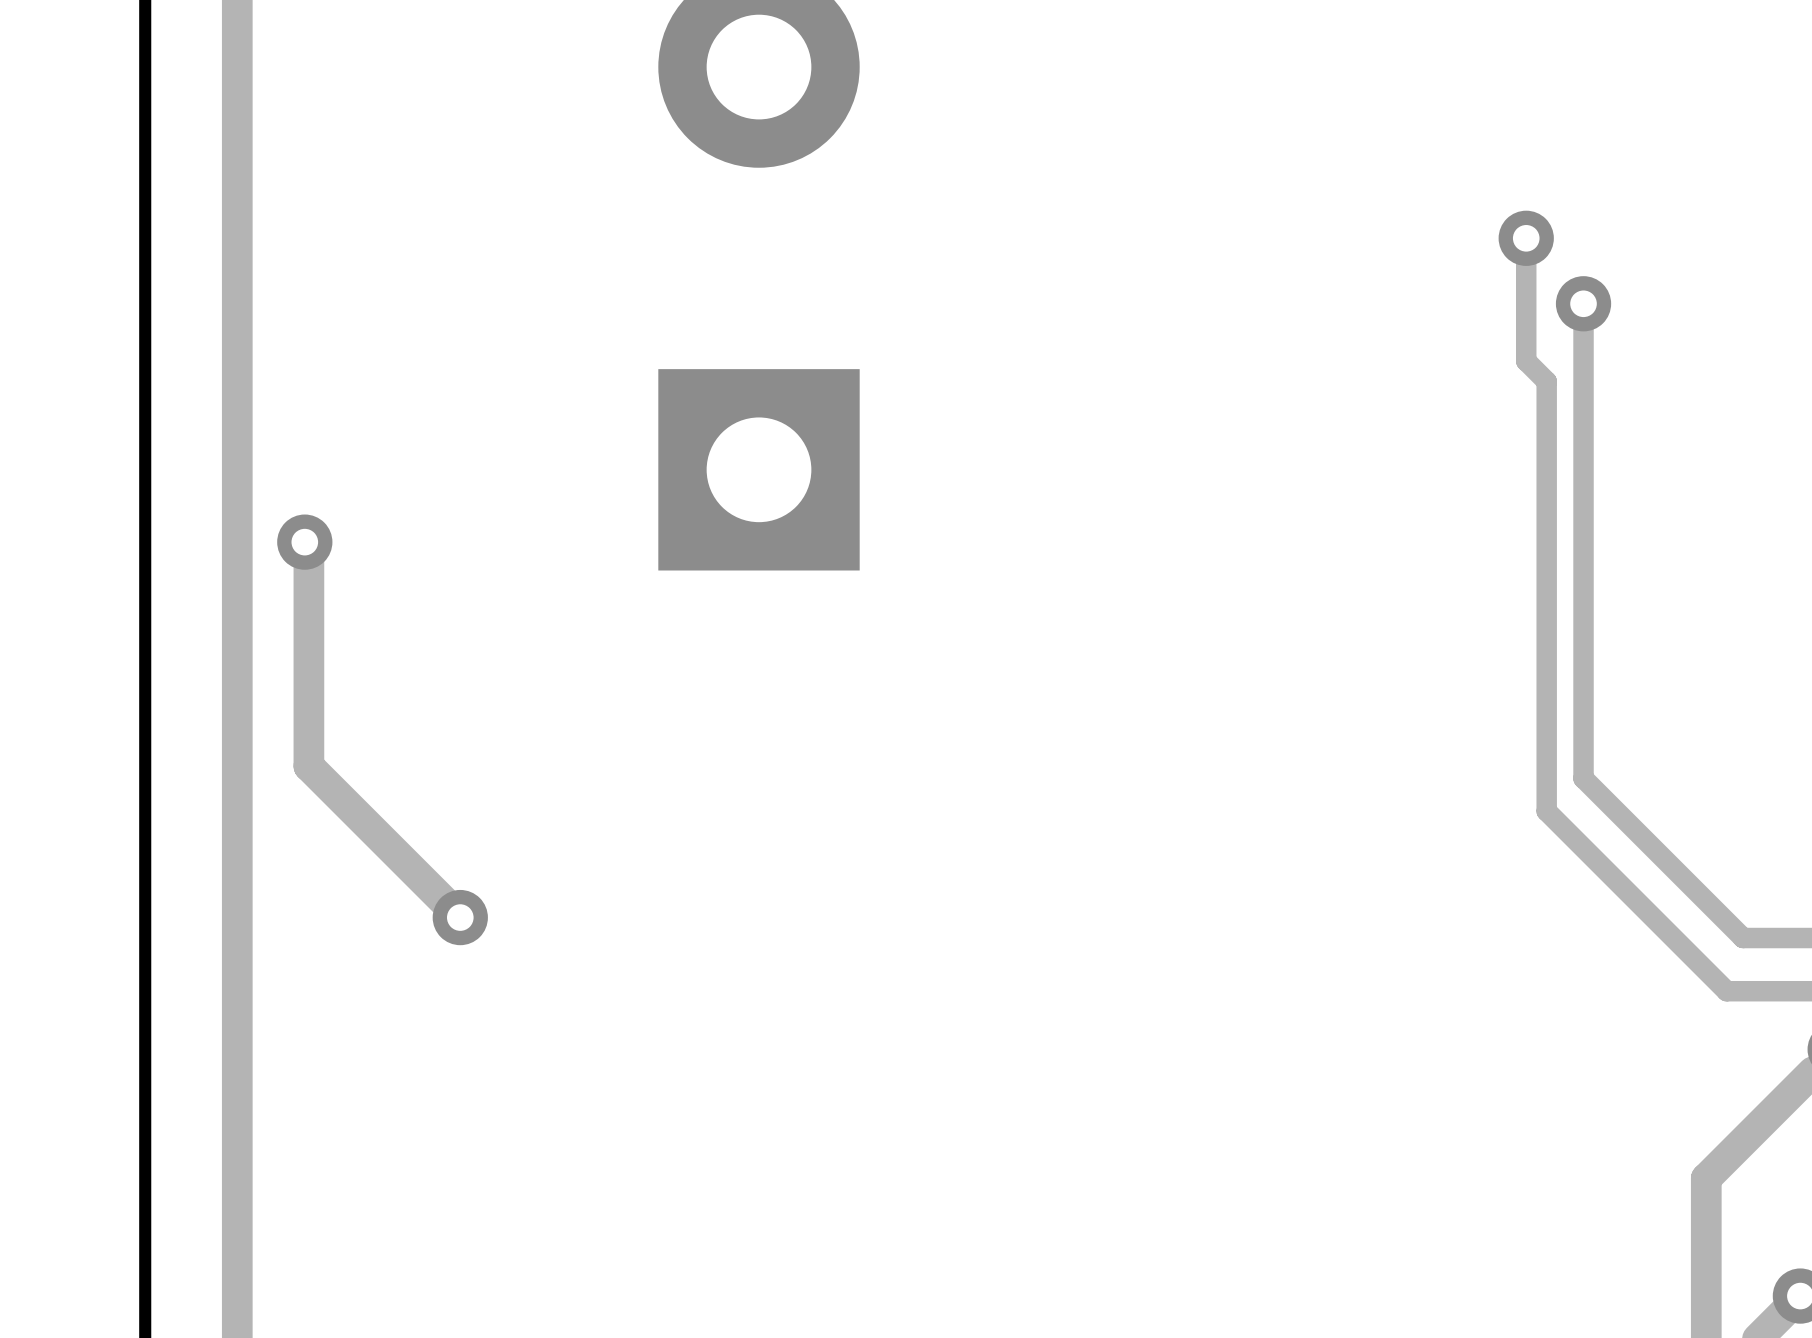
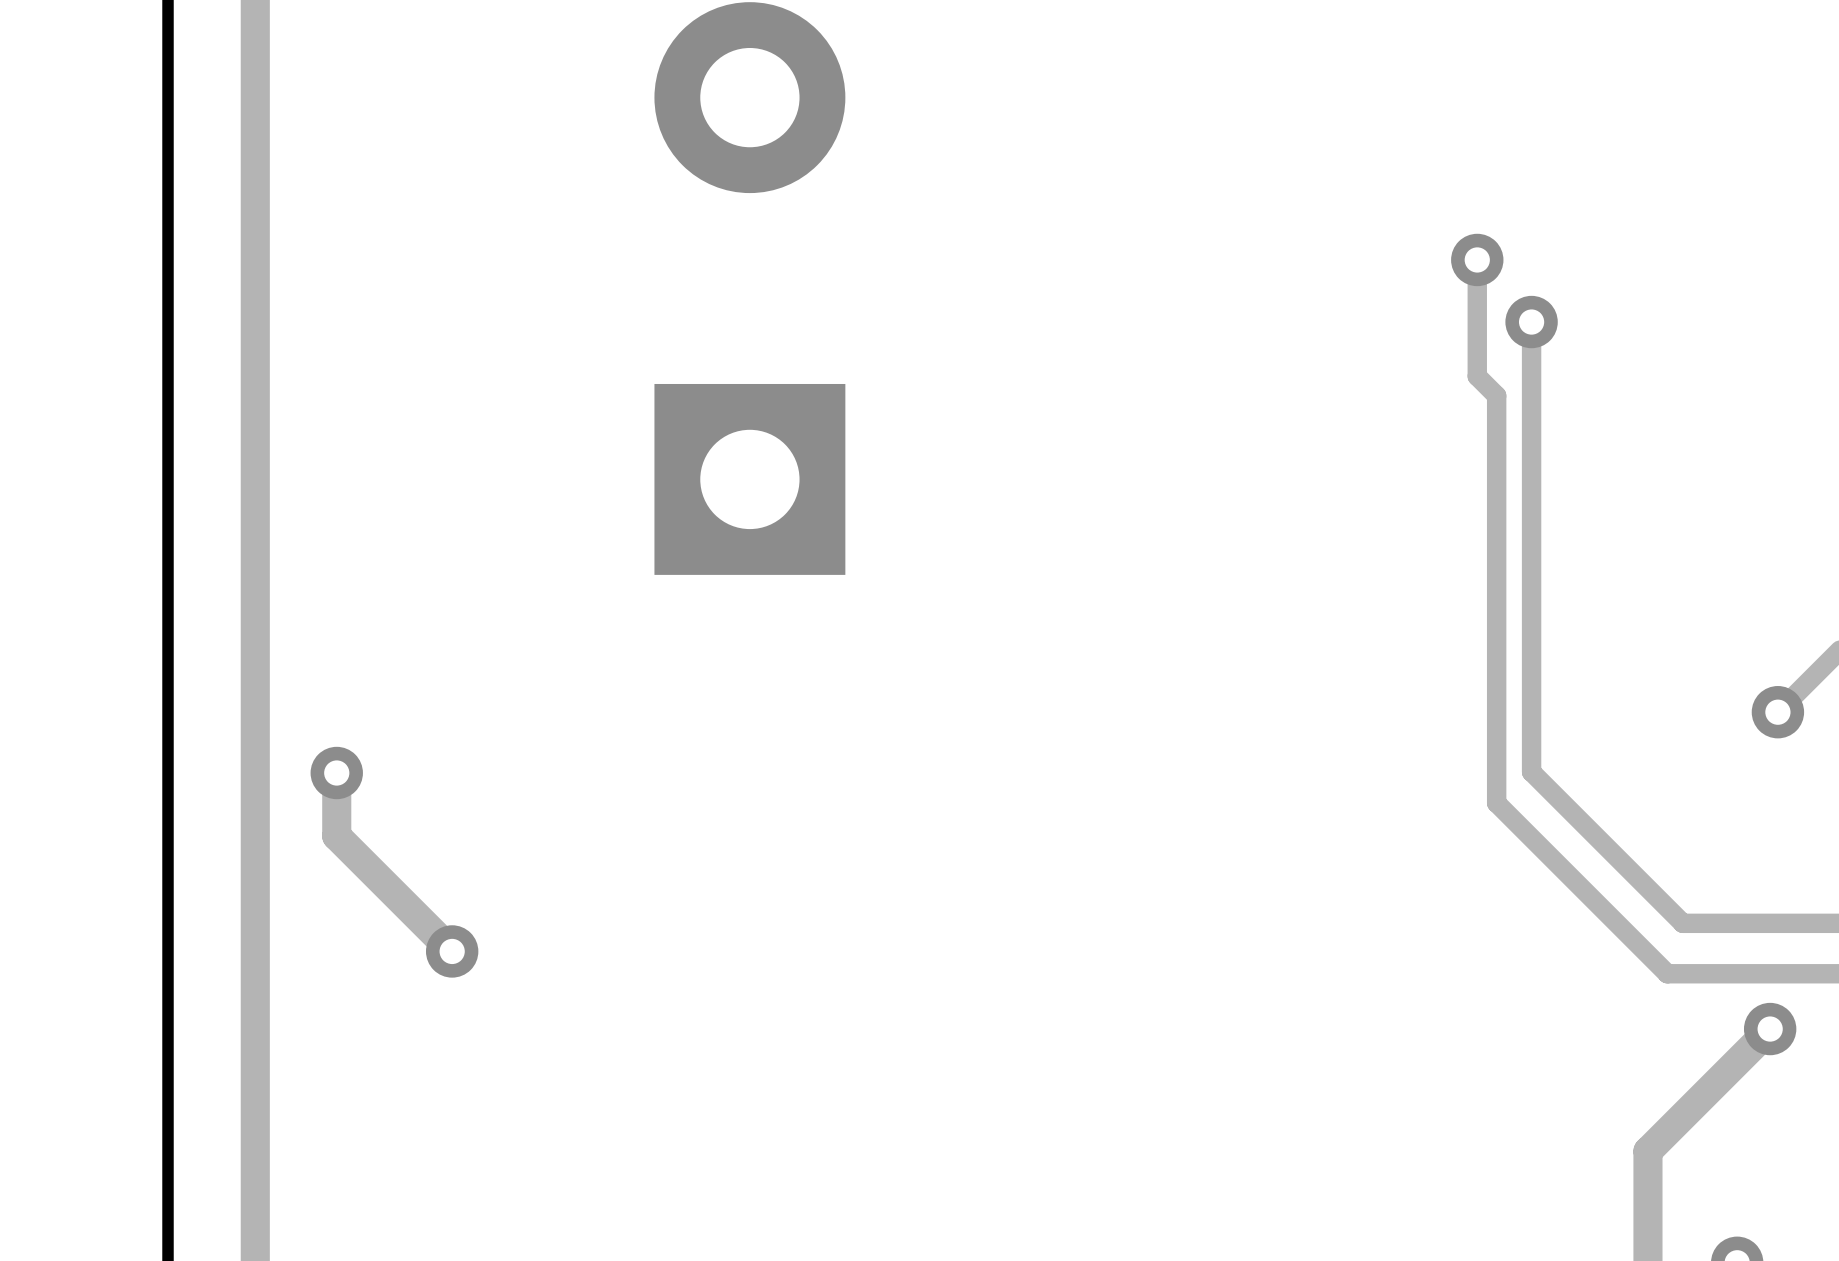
track: (304, 542) (308, 546) (308, 766) (460, 917) -> none
via: (304, 542) -> none
track: none -> (336, 773) (336, 836) (452, 951)
via: none -> (336, 773)
via position: (460, 917) -> (452, 951)

